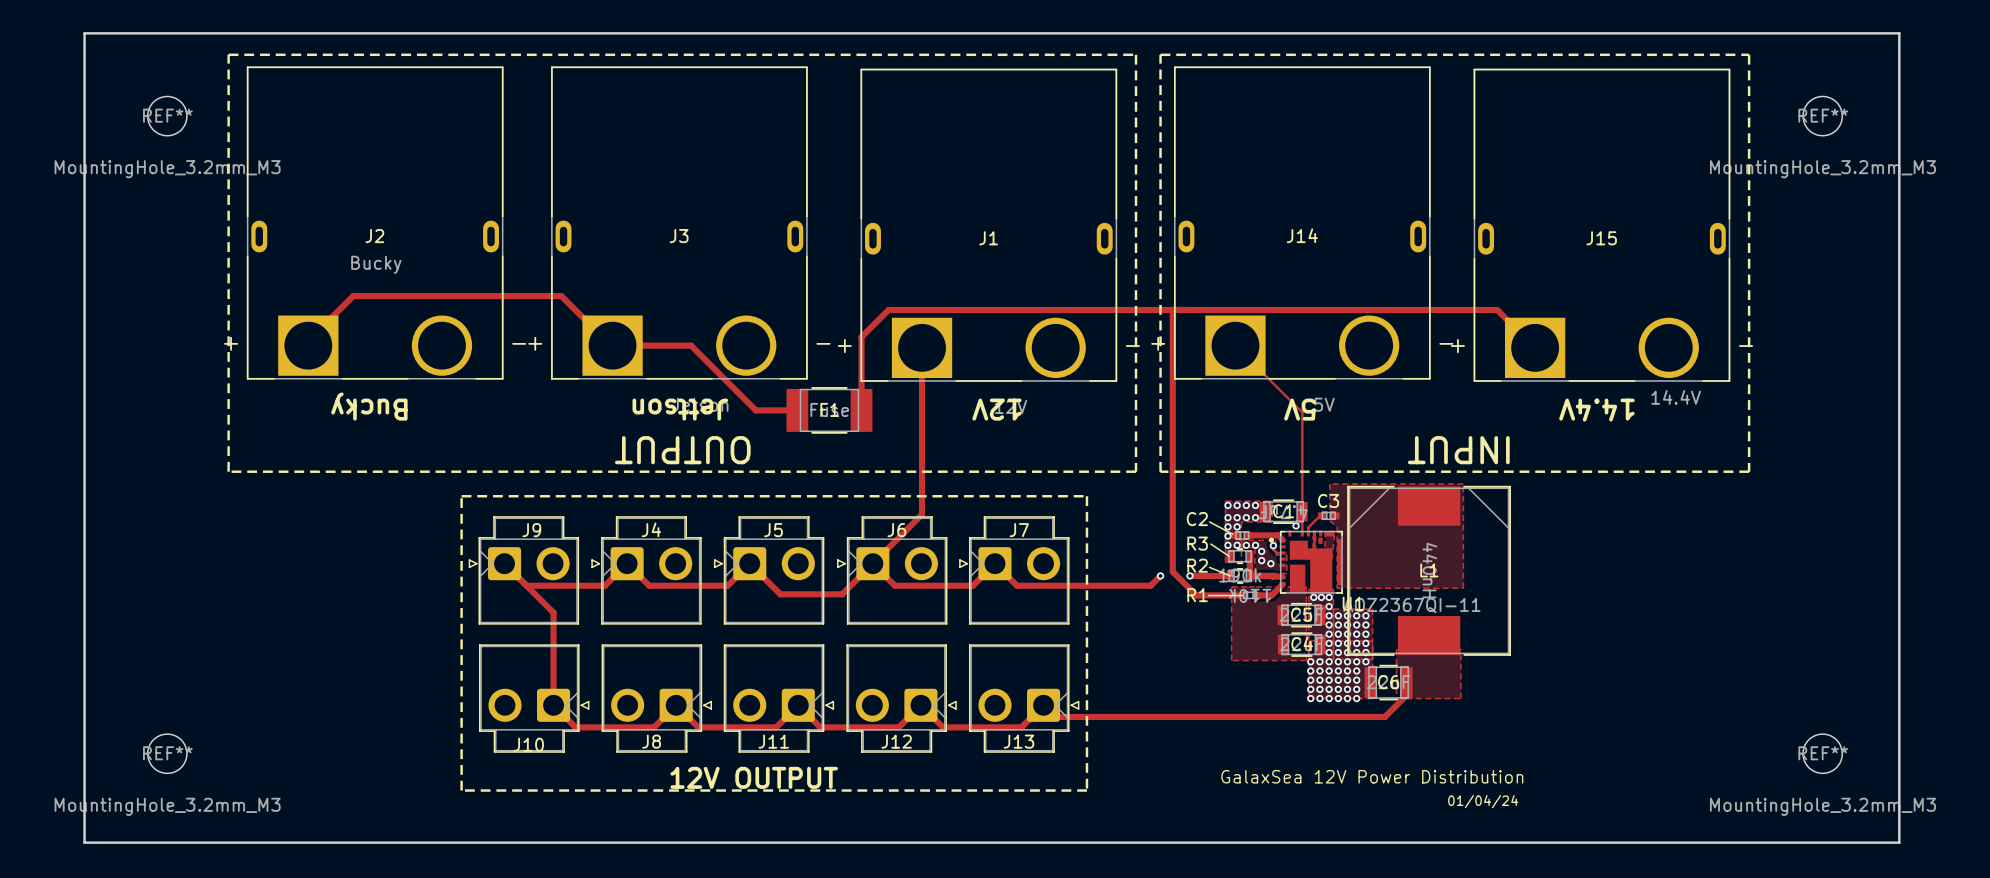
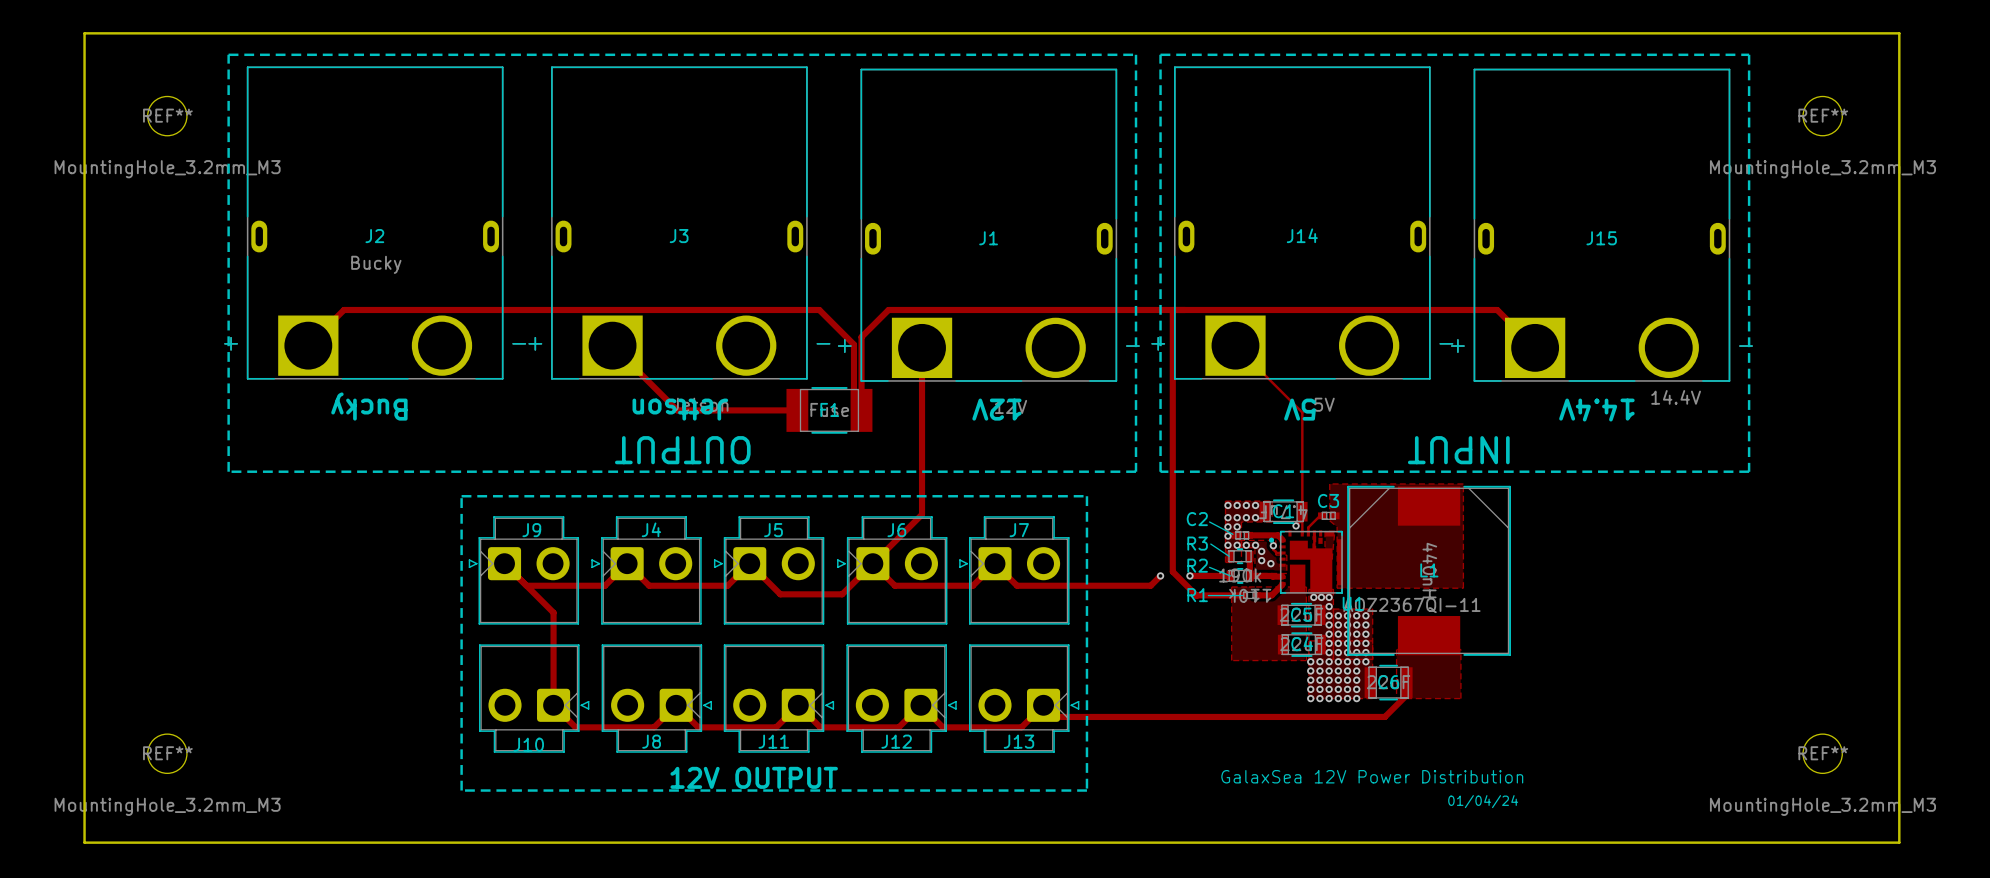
track: (303, 345) (353, 296) (561, 296) (610, 345) -> none
track: none -> (308, 345) (343, 309) (819, 309) (853, 344) (853, 410)
track: (612, 345) (691, 345) (755, 410) -> (612, 345) (677, 410) (755, 410)

